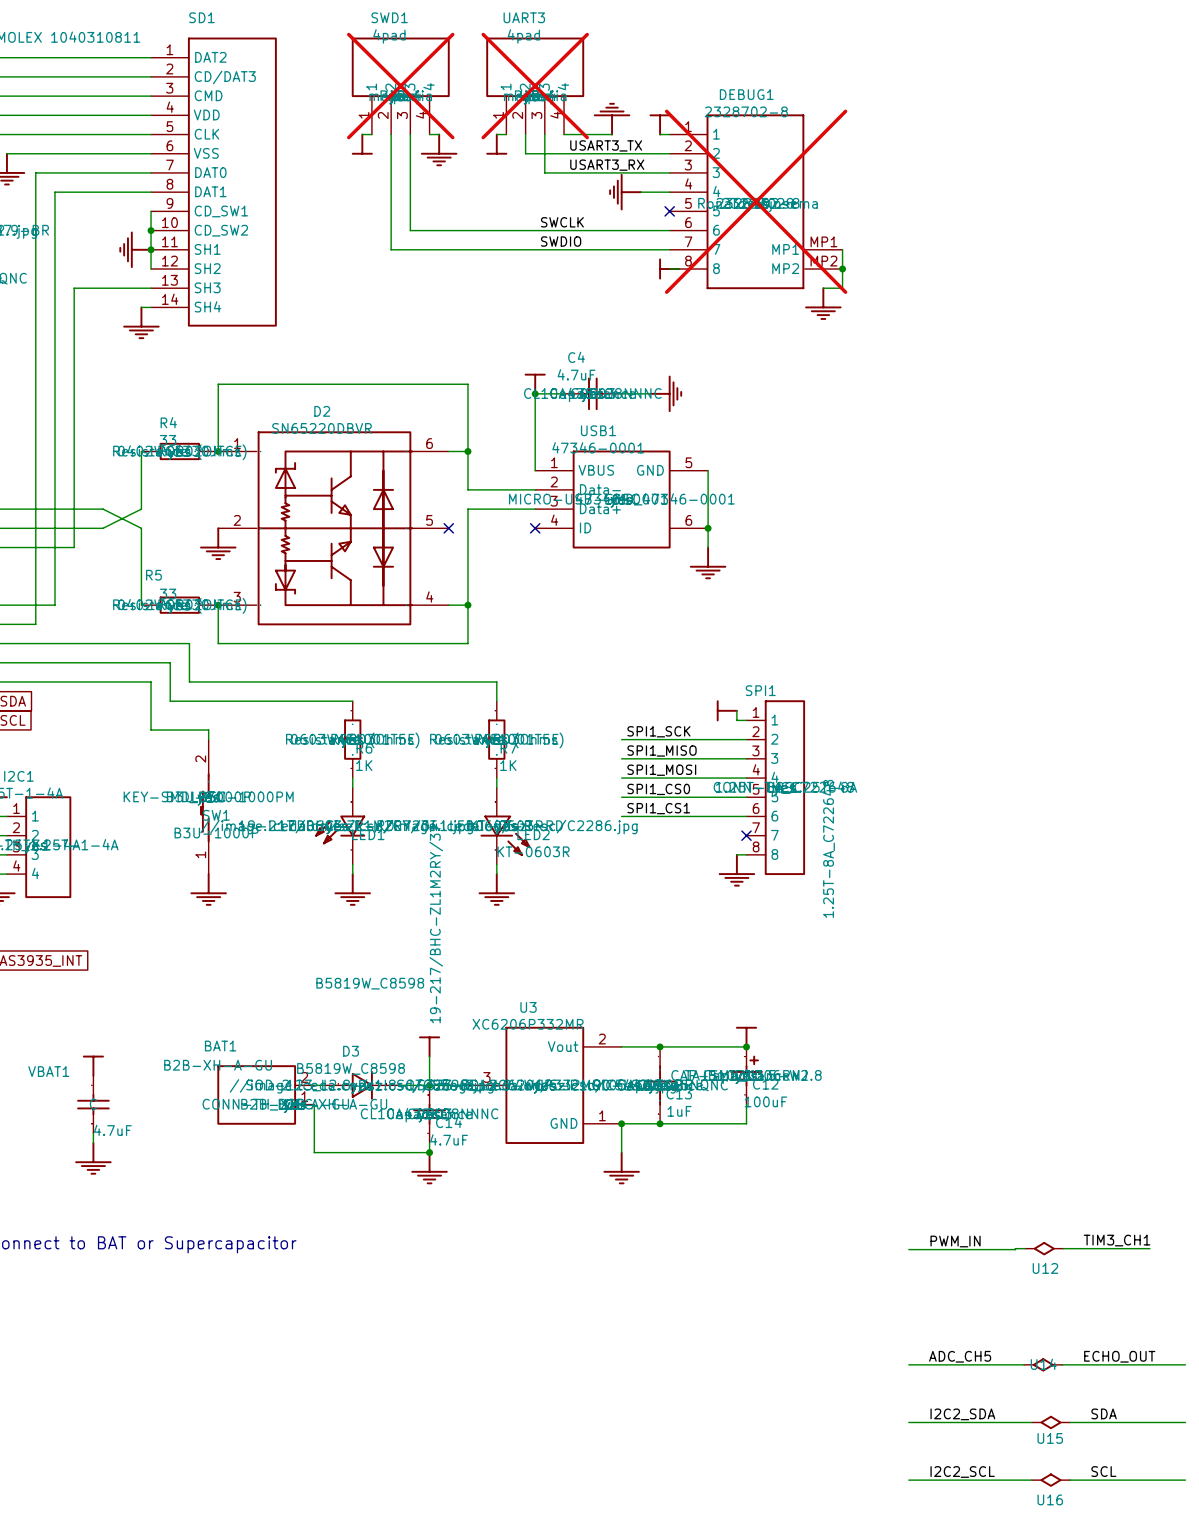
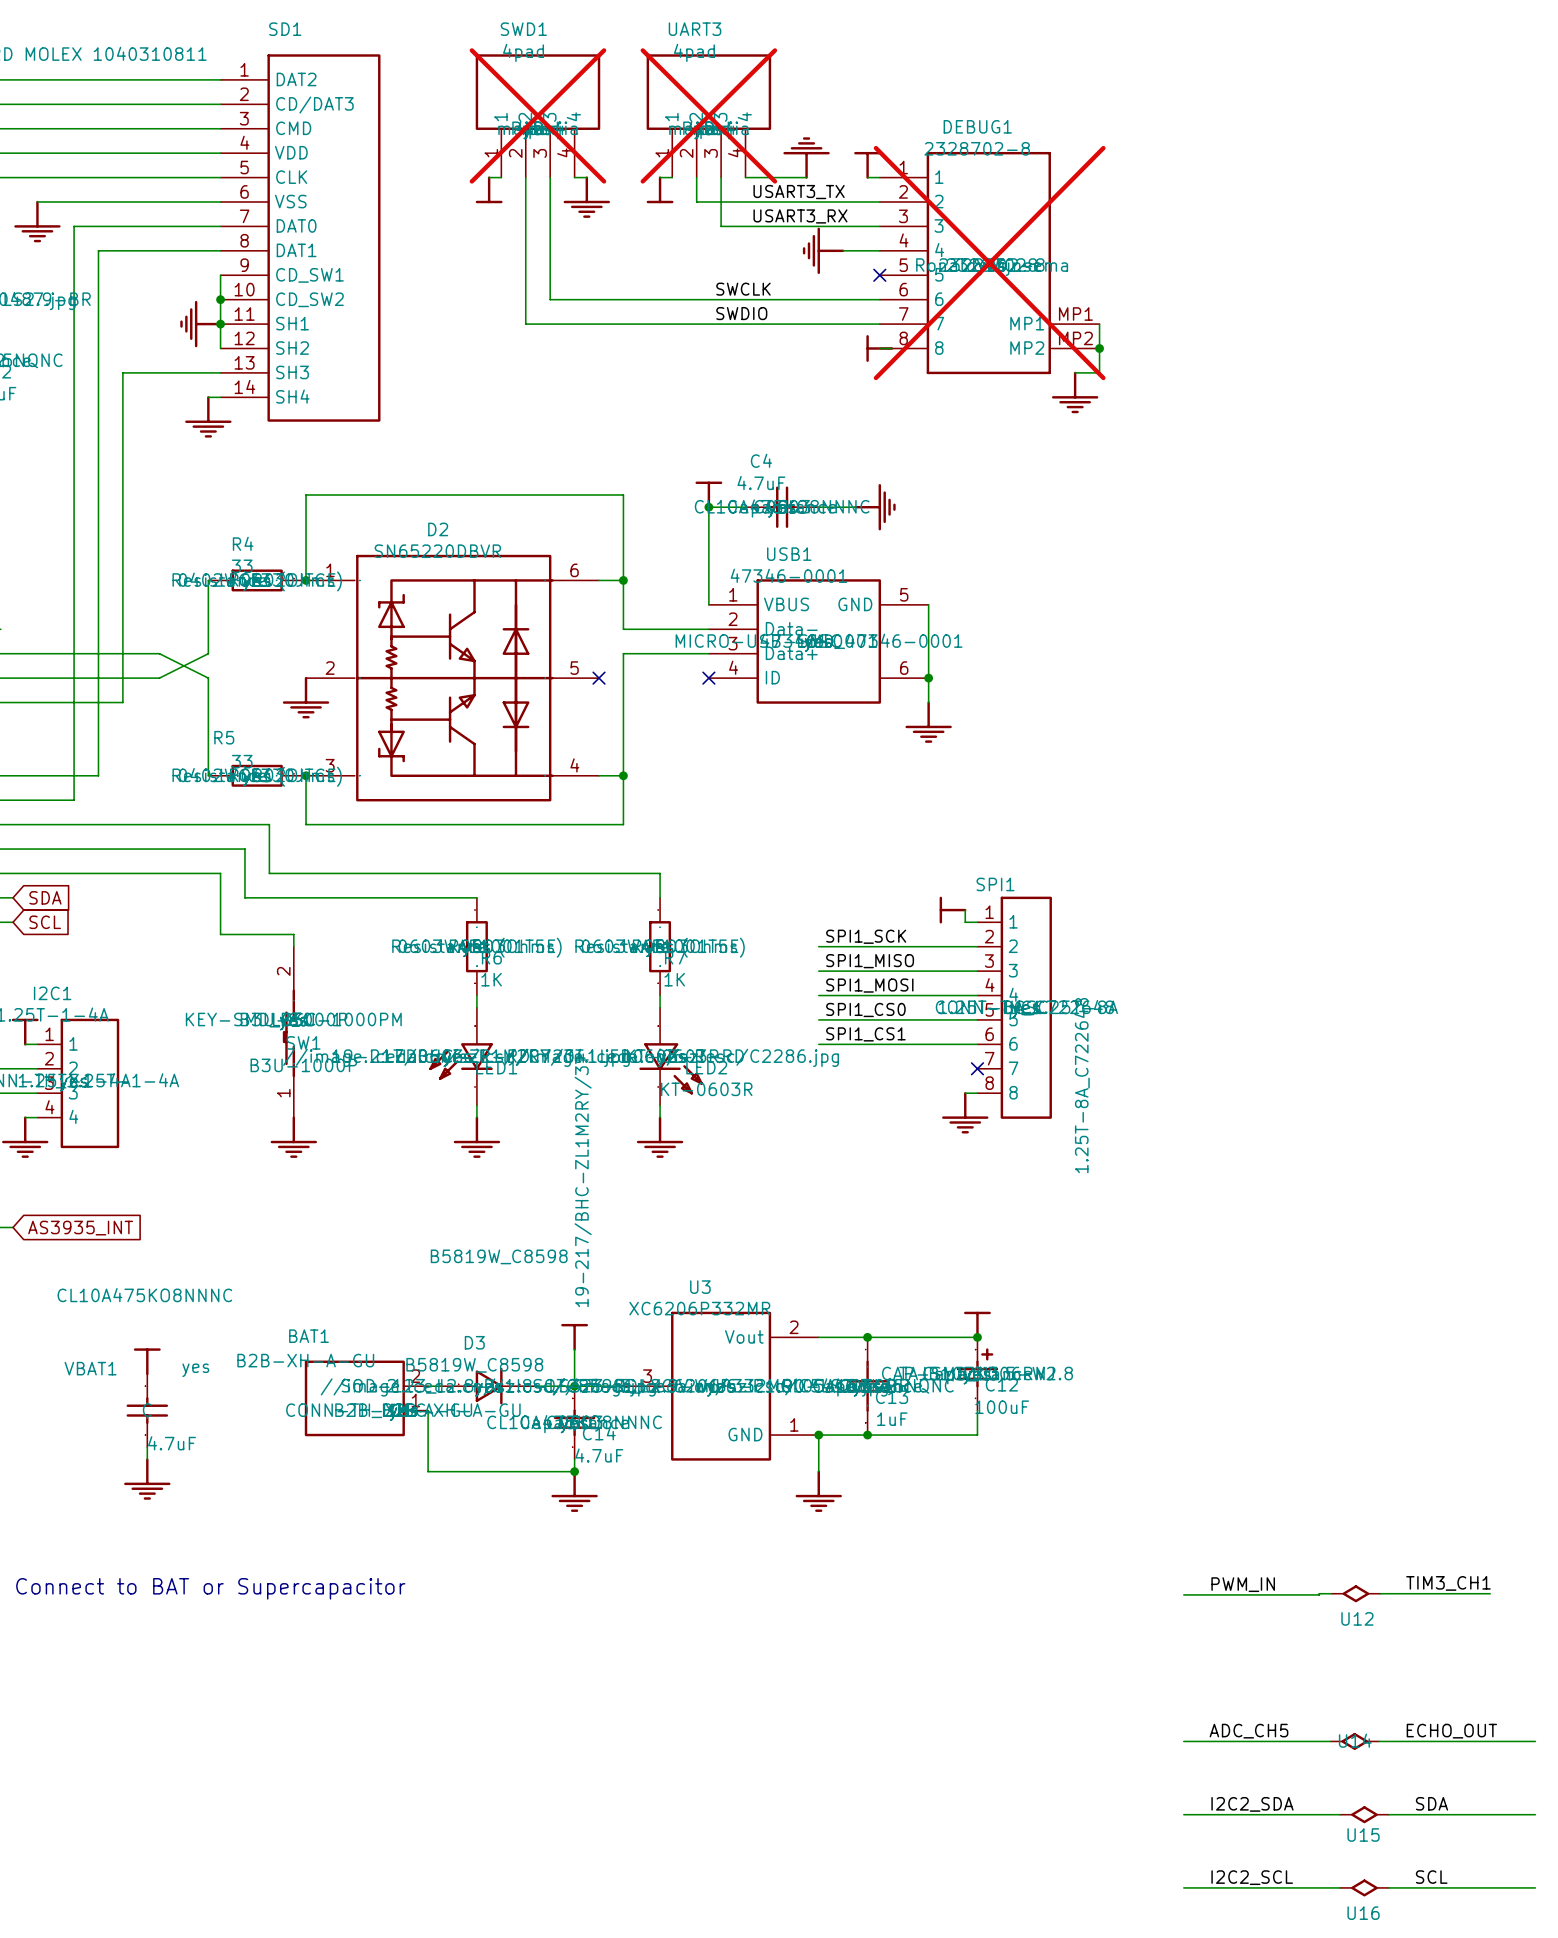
VBAT1 text: none -> CL10A475KO8NNNC (144, 1295)
VBAT1 text: none -> yes (195, 1370)

